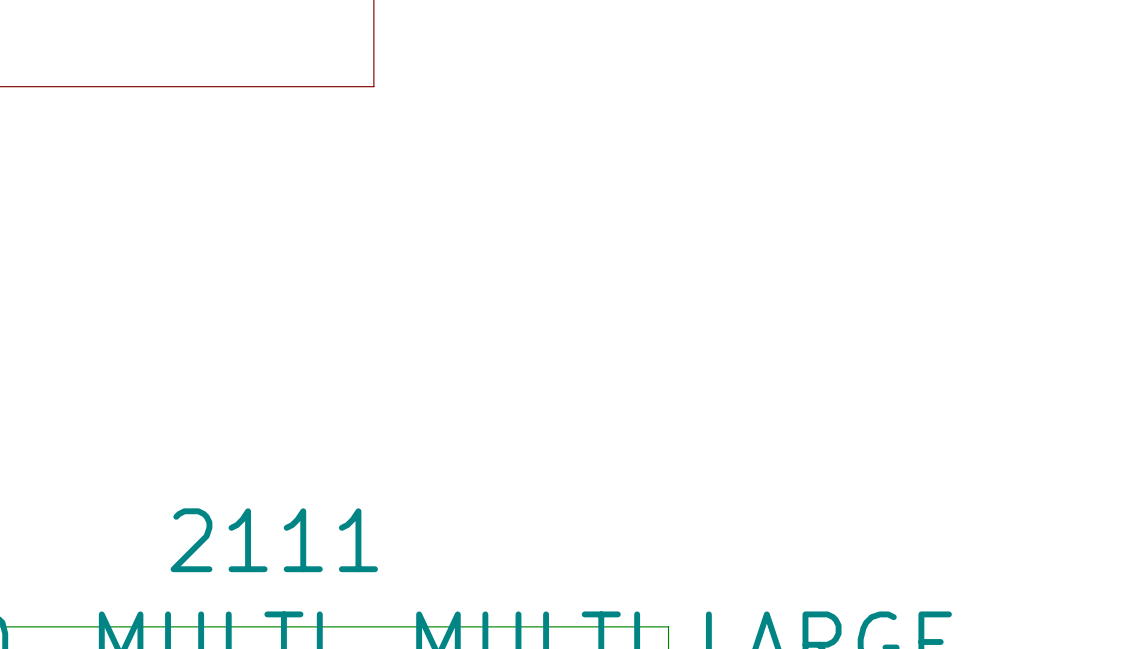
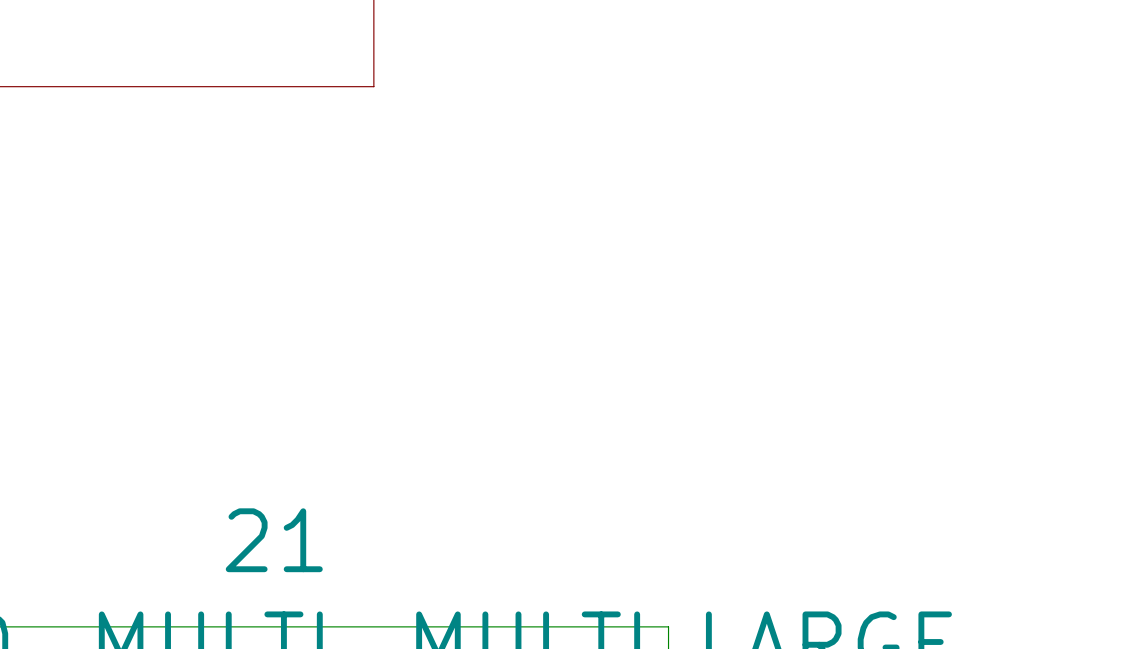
2111 name: 2111 (274, 540) -> 21 (274, 540)

